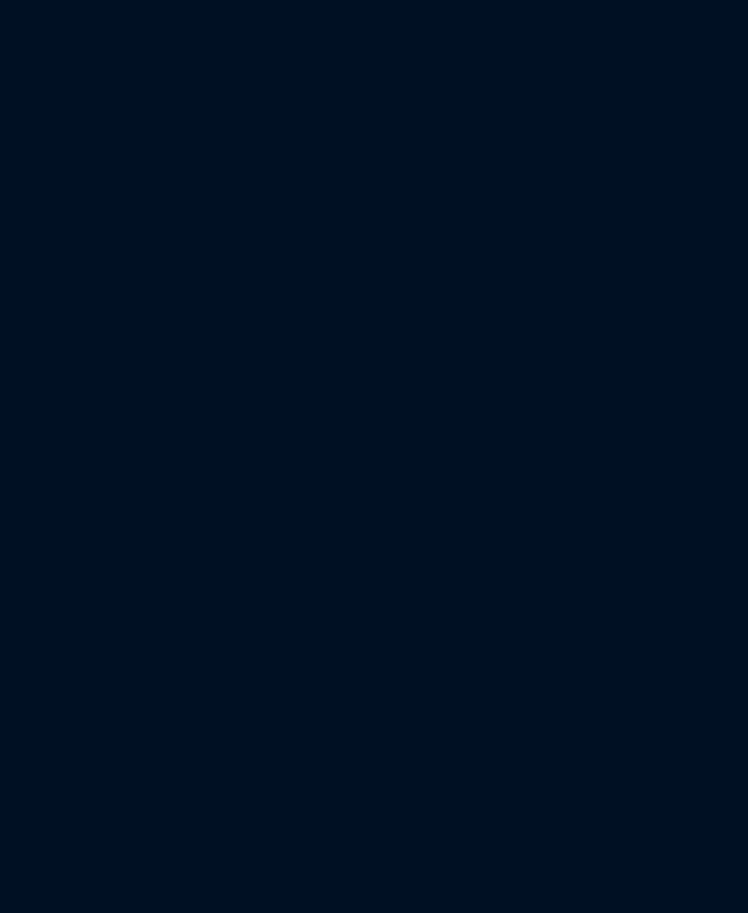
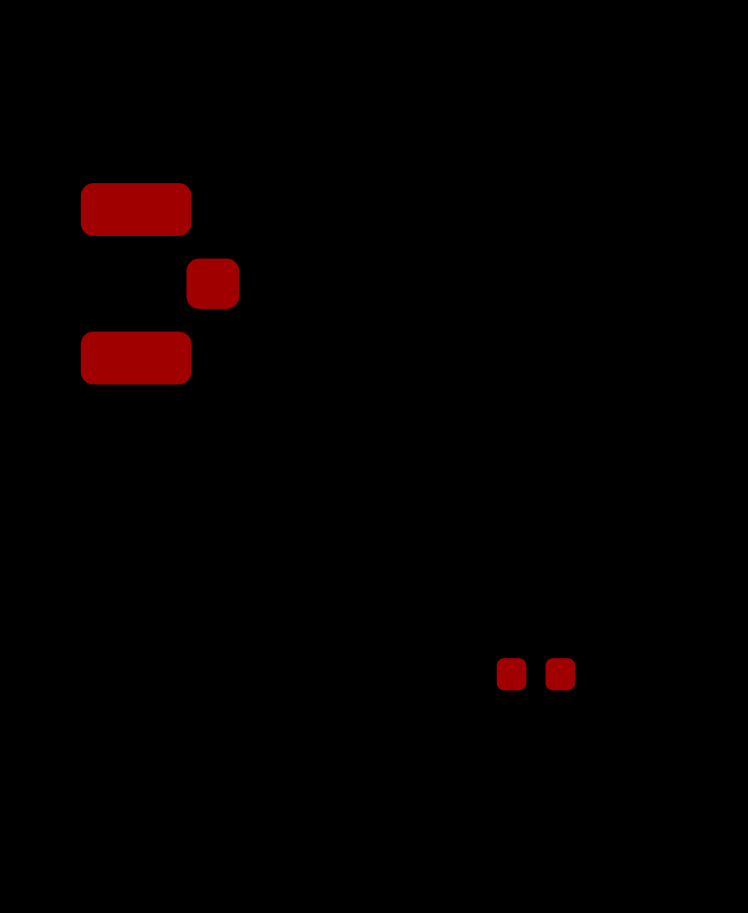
part: none -> (160, 283)
part: none -> (535, 674)

